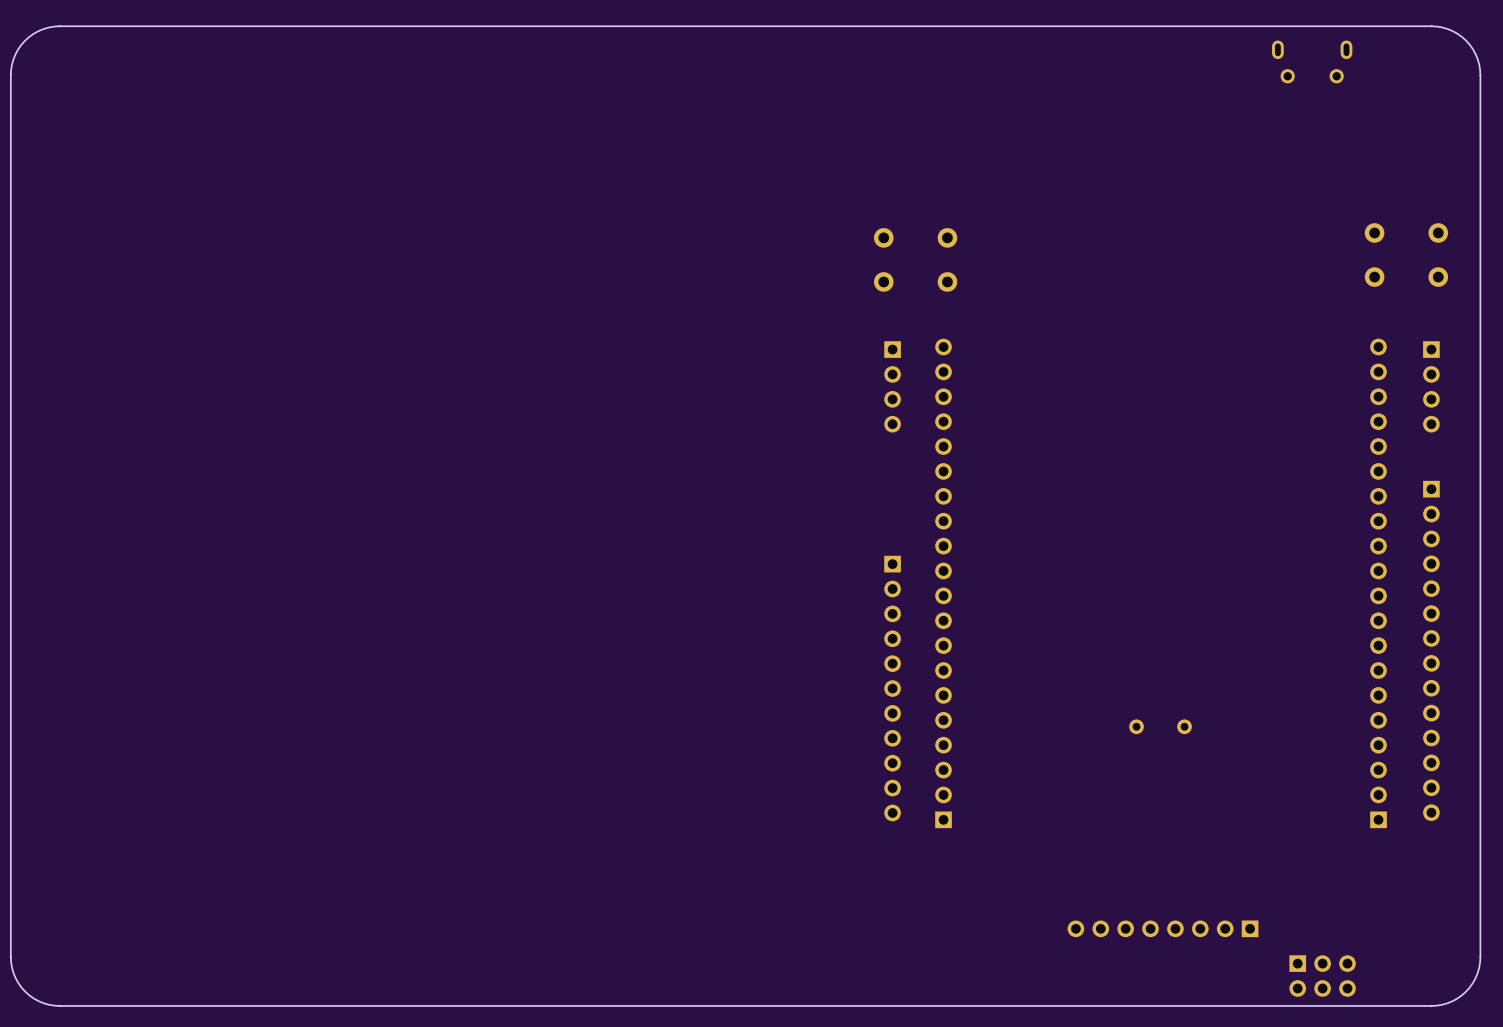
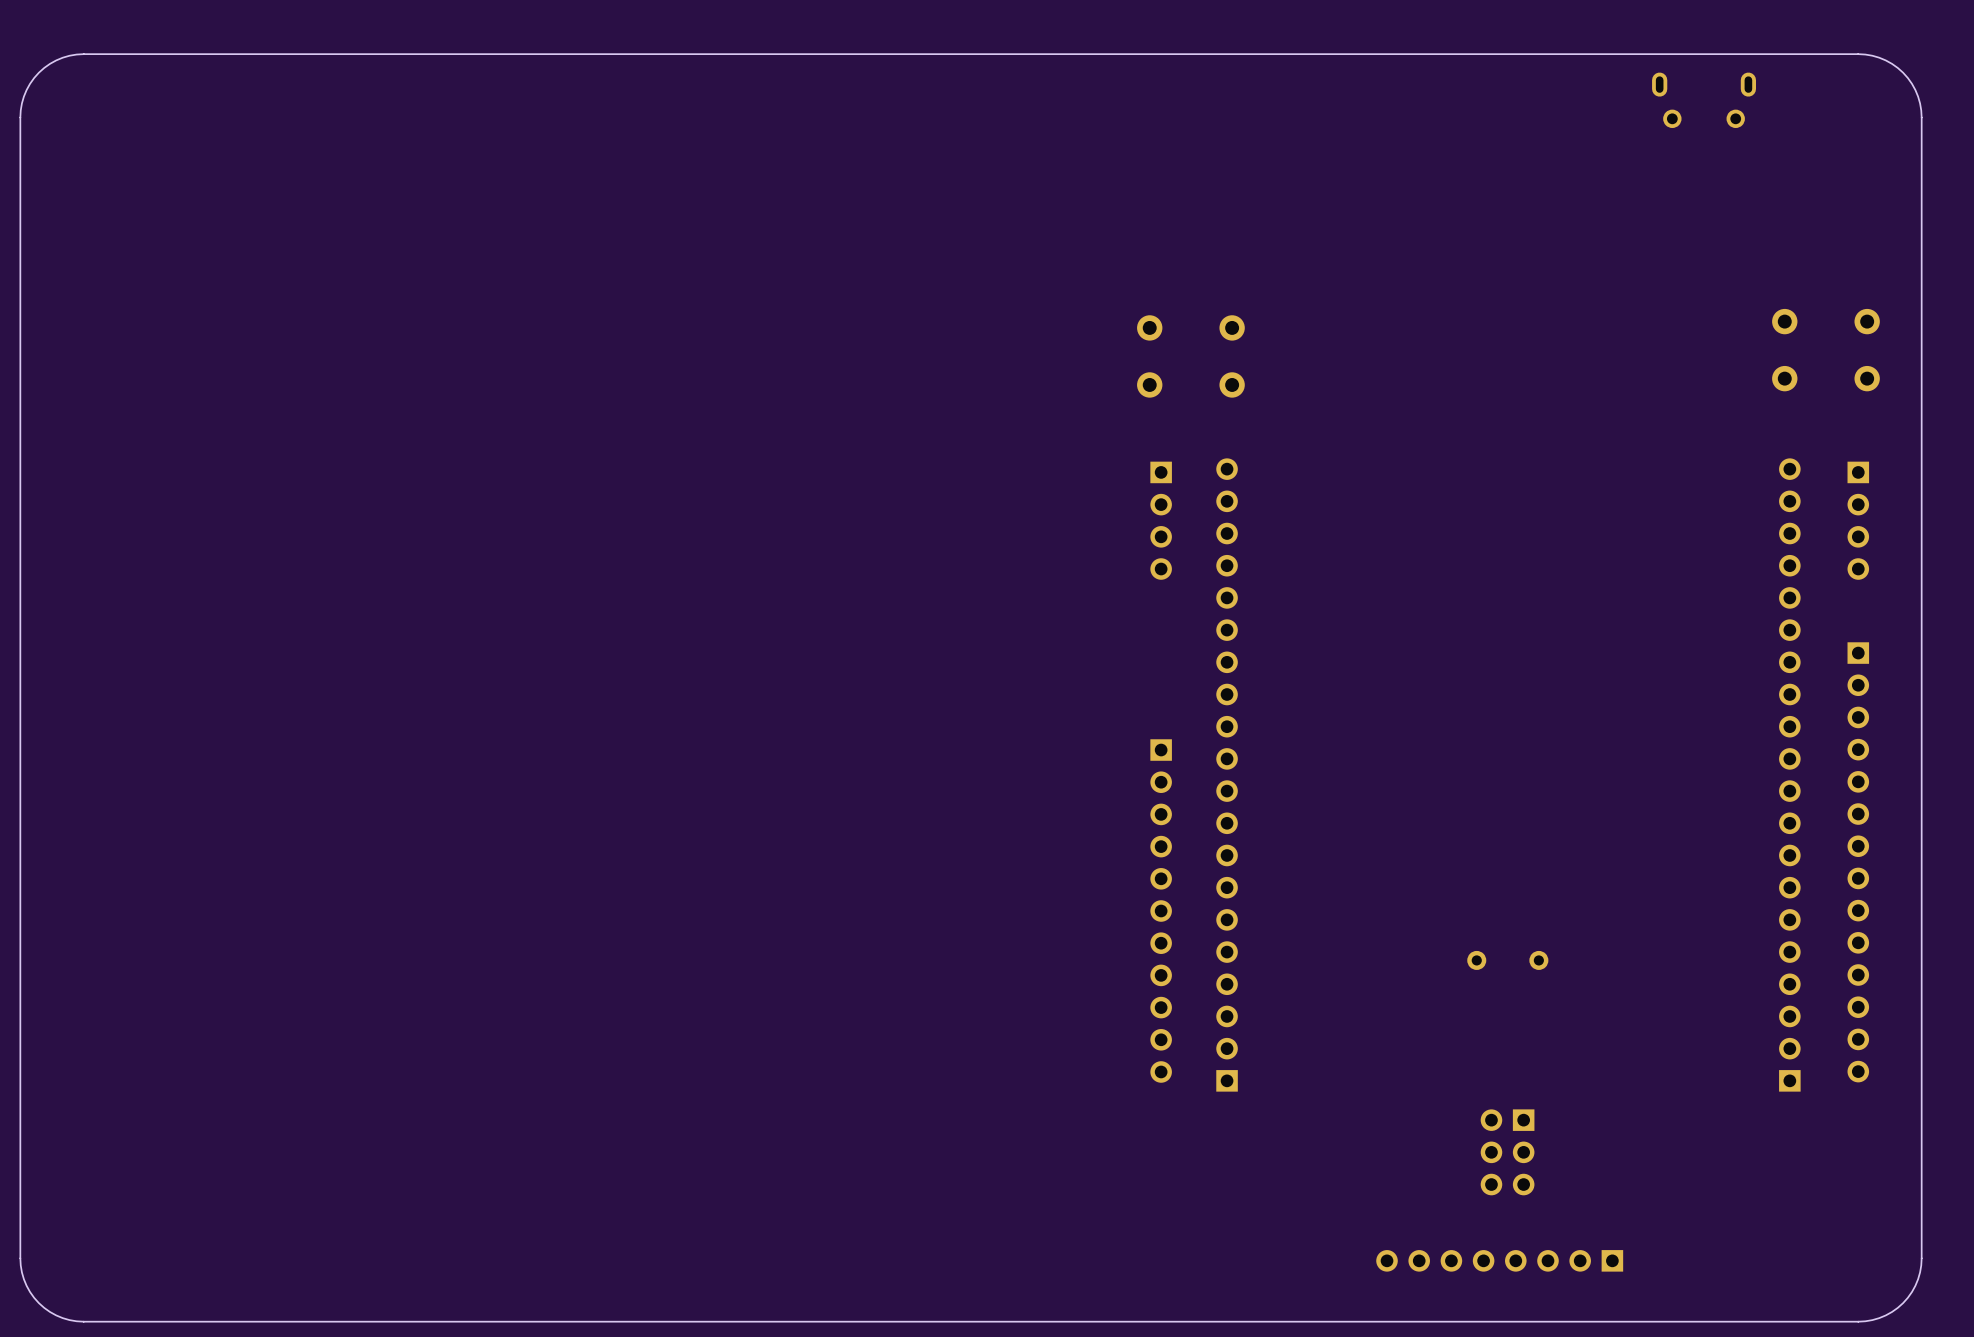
part position: (1163, 928) -> (1499, 1260)
part rotation: 0° (1322, 976) -> 90° clockwise (1507, 1152)
part position: (1322, 976) -> (1507, 1152)

